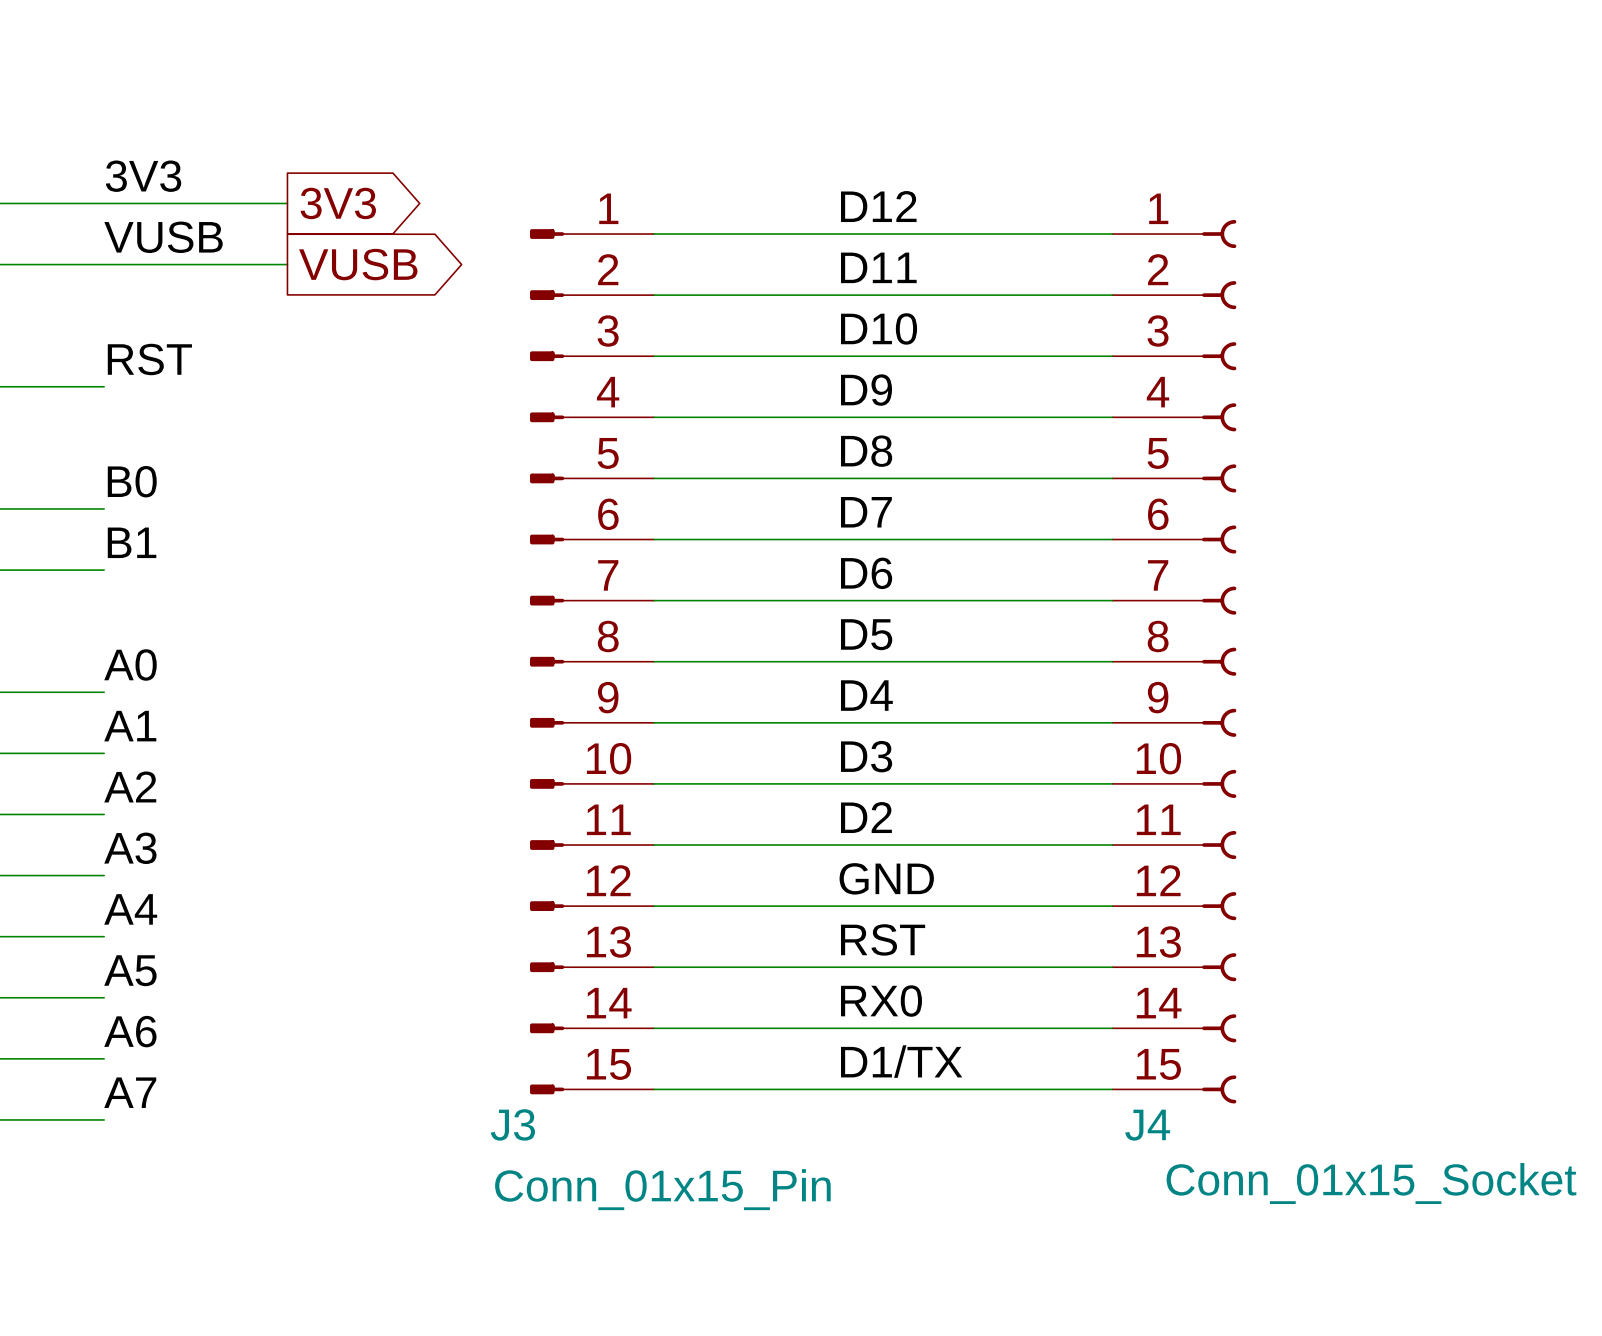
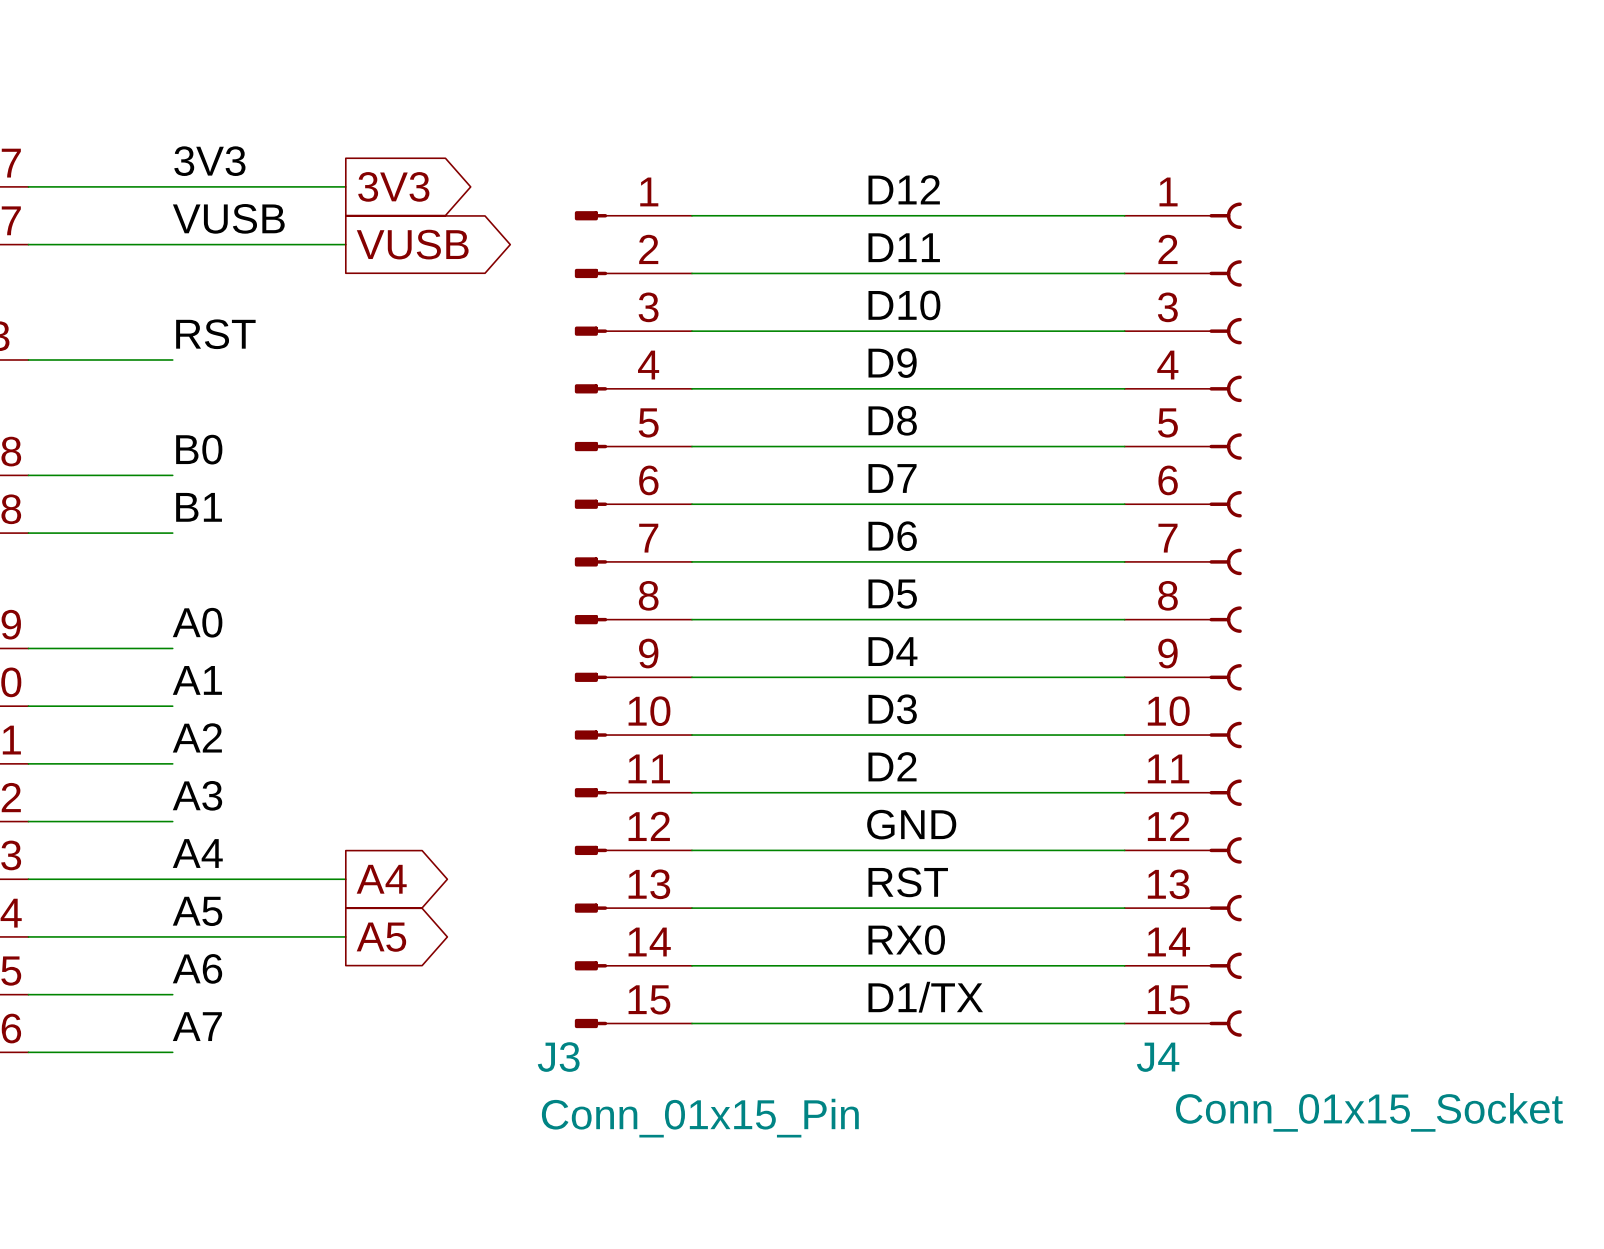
wire: none -> (172, 879) (345, 879)
global label: none -> A4 (381, 879)
wire: none -> (172, 936) (345, 936)
global label: none -> A5 (381, 937)

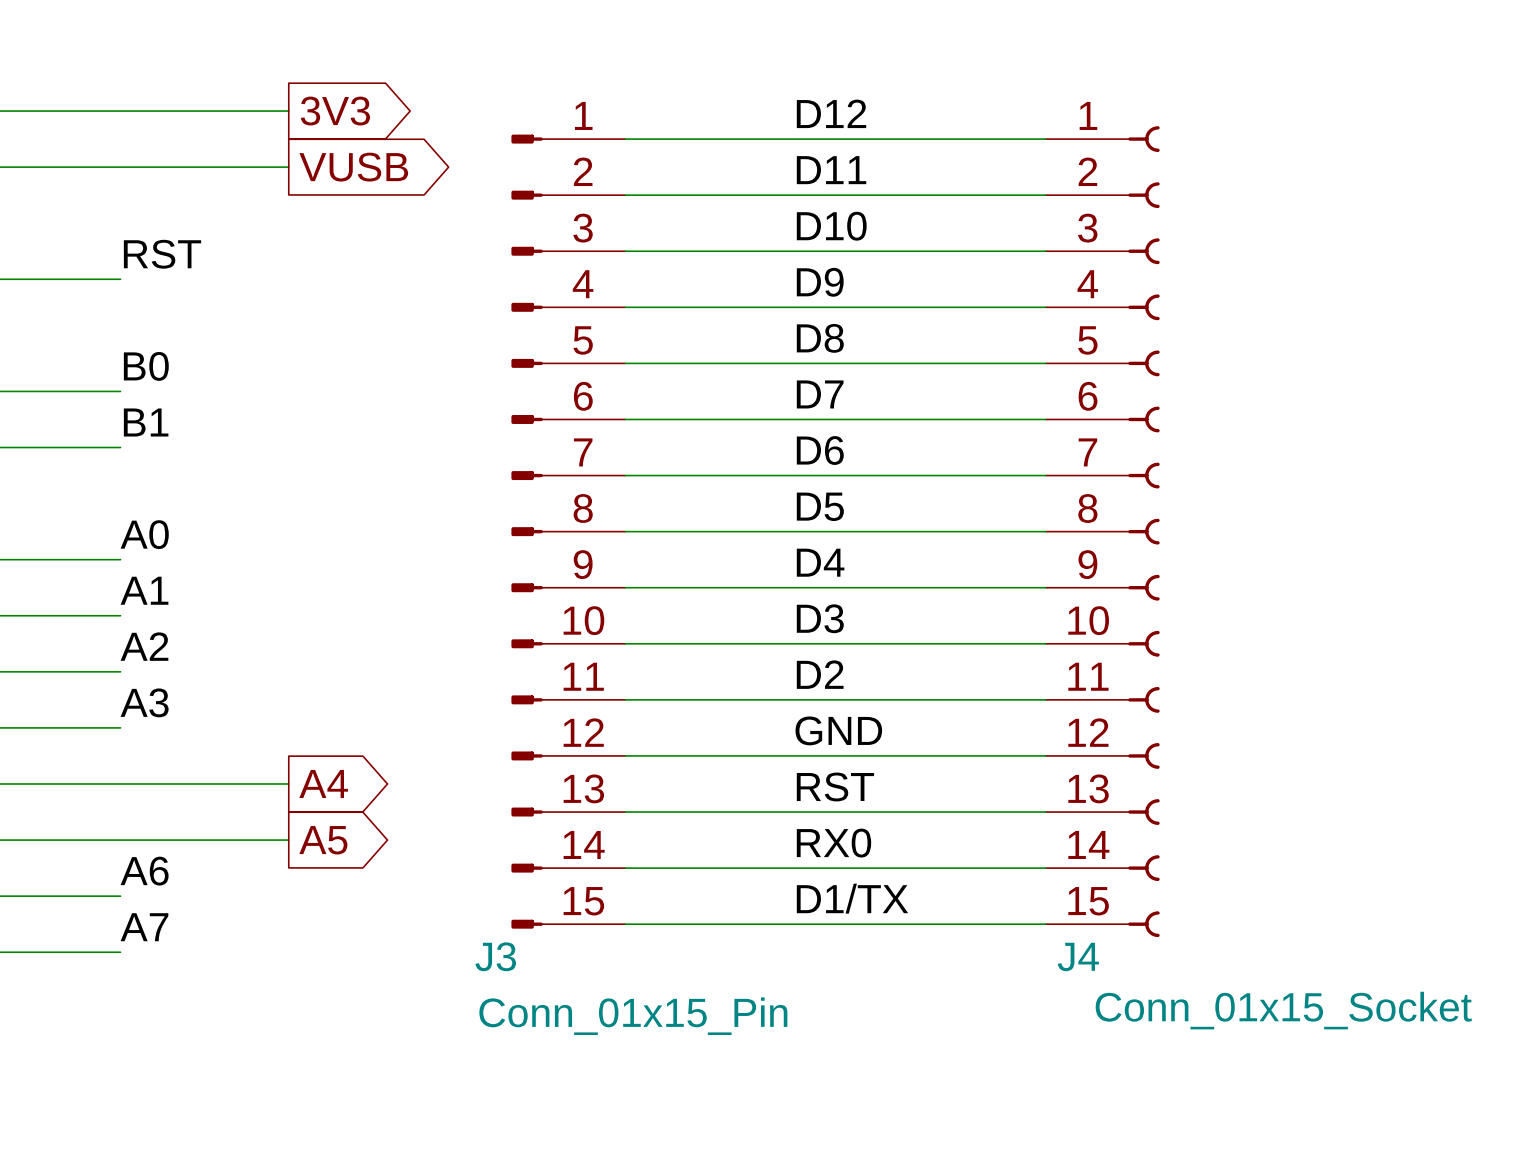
label: 3V3 (209, 161) -> none
label: VUSB (228, 218) -> none
label: A4 (197, 853) -> none
label: A5 (197, 911) -> none

